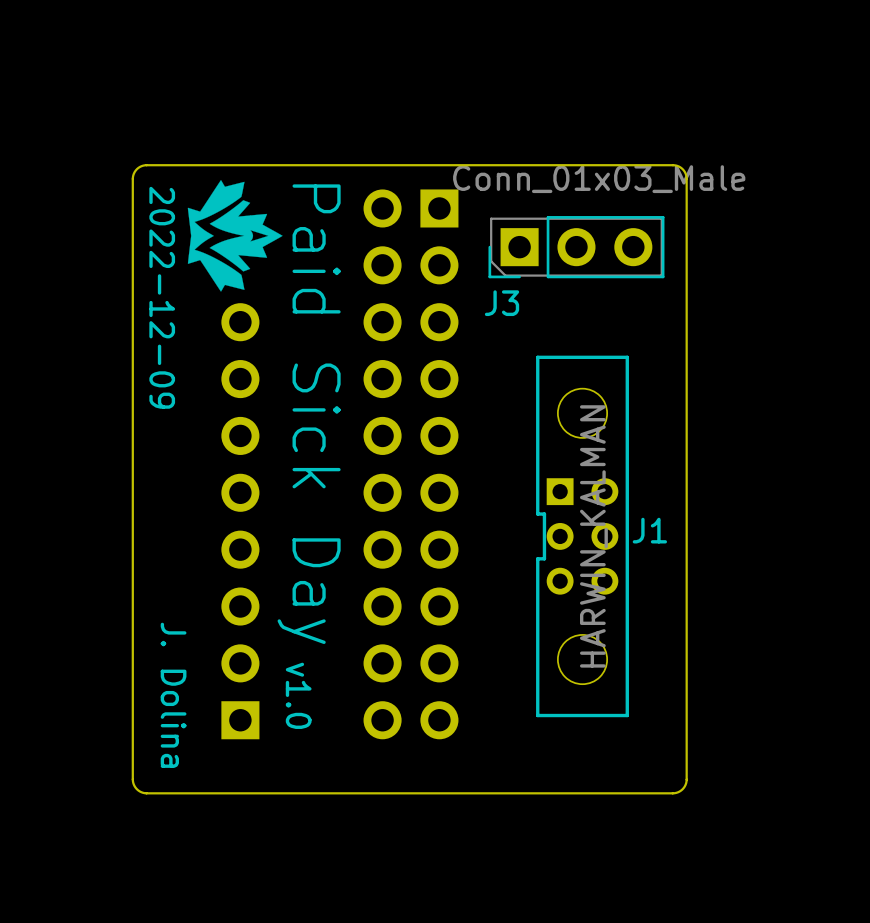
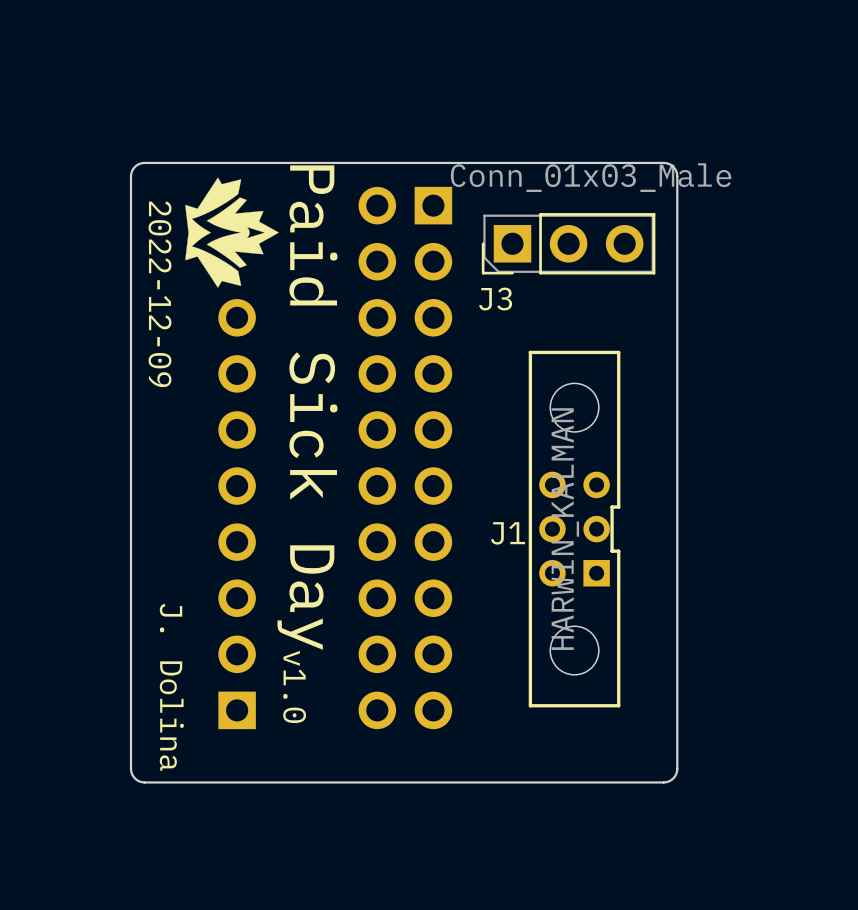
J1 rotation: 0° (582, 536) -> 180° (574, 529)

